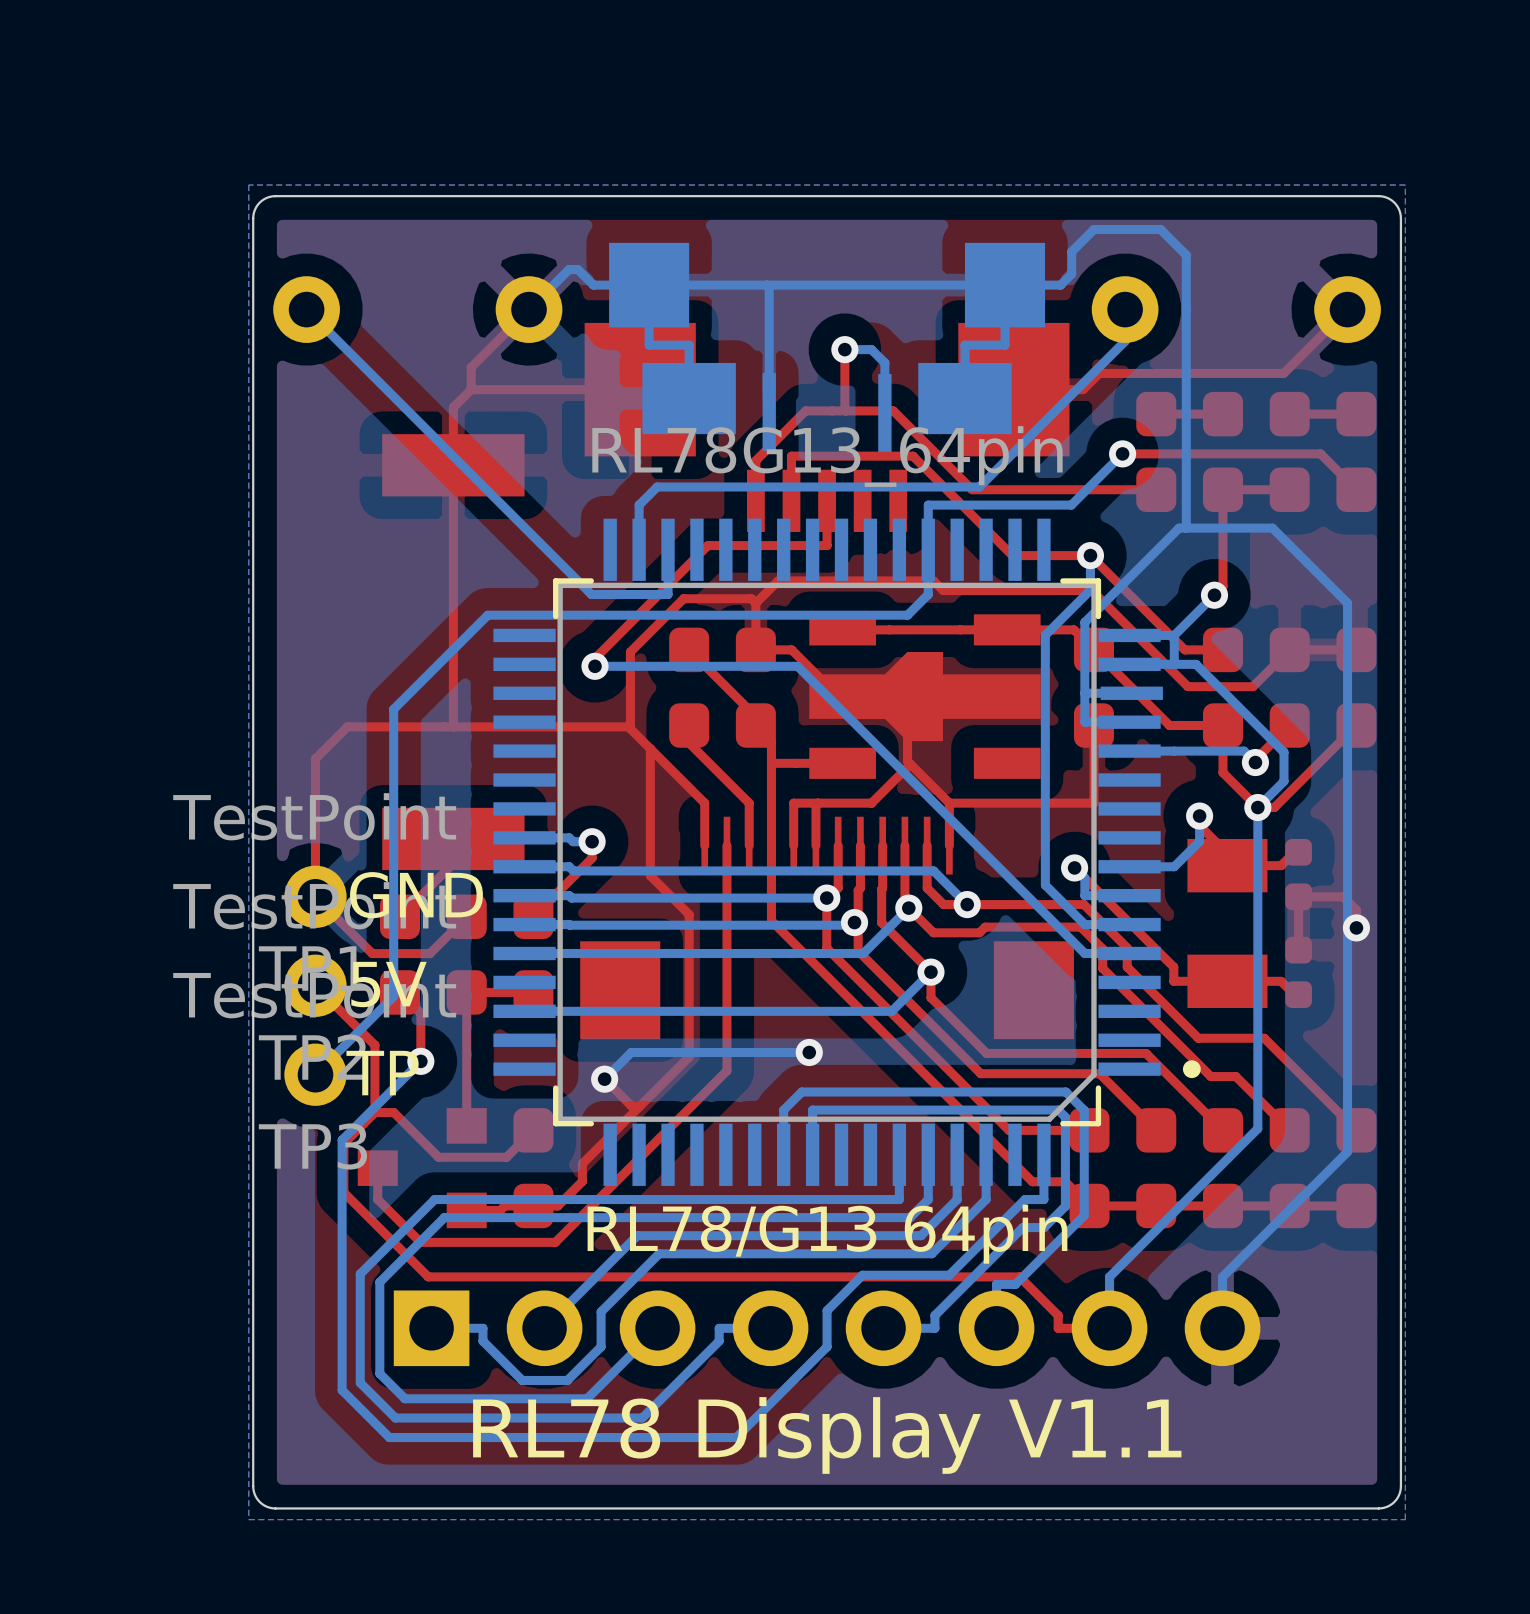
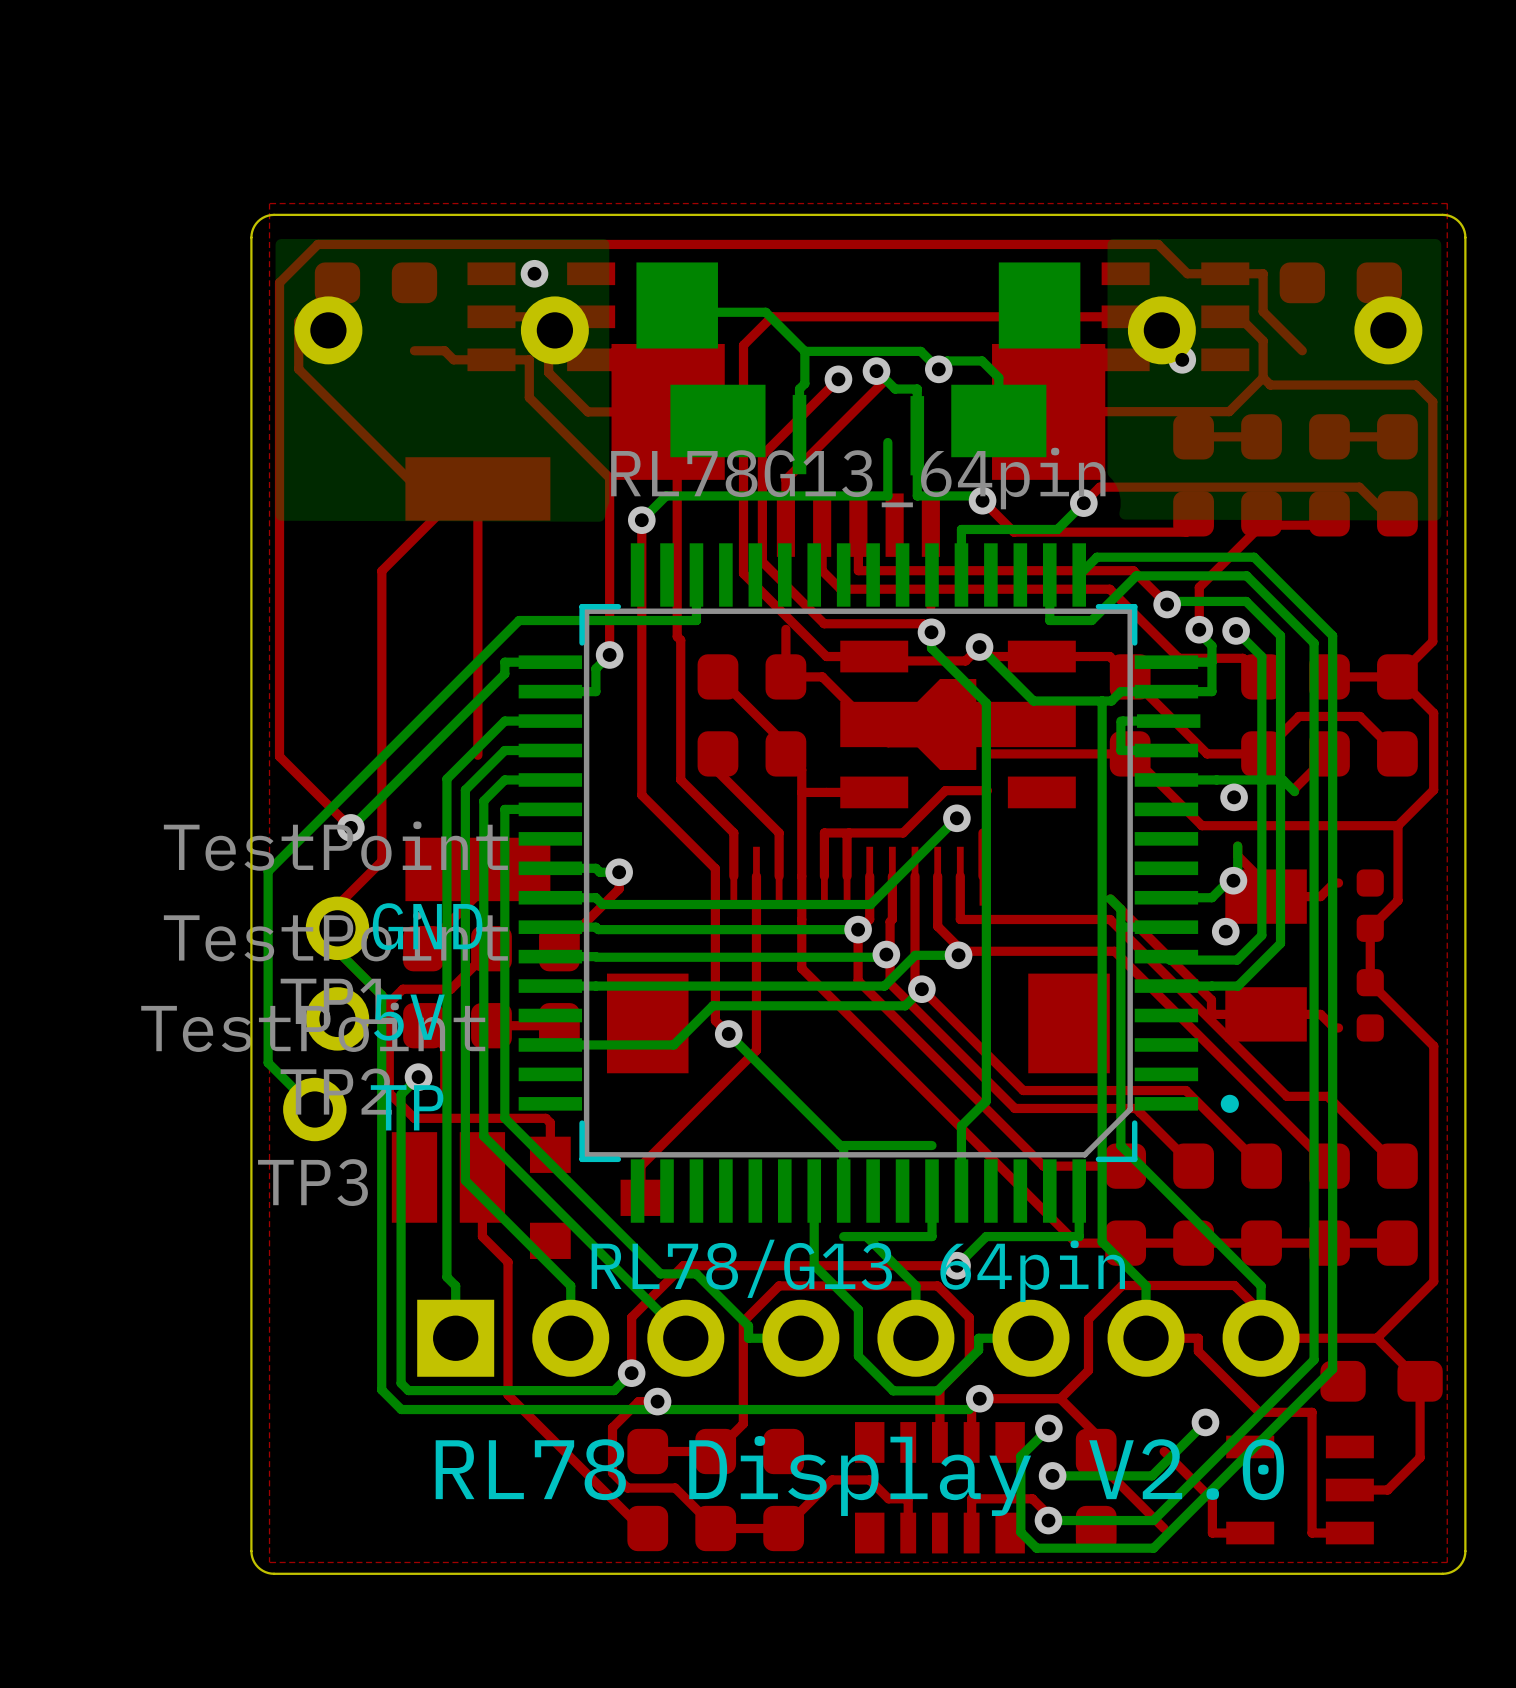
bottom zone outline: (1405, 185) (1405, 1519) (248, 1519) (248, 185) (1405, 185) -> none
board edge: (1378, 196) (1387, 197) (1394, 202) (1399, 209) (1400, 218) (1400, 1486) (1399, 1494) (1394, 1501) (1387, 1506) (1378, 1508) (275, 1508) (266, 1506) (257, 1499) (253, 1486) (253, 218) (254, 209) (259, 202) (266, 197) (275, 196) -> (1420, 214) (1445, 215) (1454, 217) (1462, 226) (1465, 237) (1465, 1551) (1463, 1559) (1458, 1567) (1451, 1572) (1442, 1573) (274, 1573) (265, 1572) (256, 1564) (251, 1551) (251, 237) (254, 226) (262, 217) (271, 215) (296, 214)
via: none -> (534, 273)
top track: none -> (337, 282) (298, 321) (298, 369) (441, 511) (381, 571) (381, 861) (314, 928) (389, 1002)
part: none -> (375, 282)
part: none -> (1340, 282)
bottom track: (649, 285) (649, 345) (689, 345) (689, 398) -> none
bottom track: (767, 285) (769, 287) (769, 367) -> (804, 351) (804, 383) (799, 389)
bottom track: (1005, 285) (1005, 345) (964, 345) (964, 356) -> (804, 351) (920, 351) (938, 369) (947, 360) (982, 360) (998, 377)
bottom track: none -> (711, 312) (765, 312) (804, 351)
part: none -> (541, 316)
part: none -> (1175, 316)
top track: none -> (1225, 316) (1239, 316) (1263, 340) (1263, 377)
bottom track: (306, 309) (591, 594) -> (314, 1109) (268, 1062) (268, 871) (519, 620) (618, 620)
top track: (529, 309) (471, 367) (471, 389) -> none
bottom track: (1125, 309) (1125, 341) (979, 486) (657, 486) (639, 505) (639, 549) -> none
top track: (1347, 309) (1283, 373) (1099, 373) (1083, 389) (1013, 389) -> none
bottom track: (532, 313) (529, 309) (569, 269) (577, 269) (593, 285) (1060, 285) (1071, 273) (1071, 251) (1093, 229) (1160, 229) (1186, 255) (1186, 528) -> none
top track: none -> (414, 350) (444, 350) (453, 359) (529, 359) (529, 397) (609, 477) (609, 654)
top track: none -> (1302, 350) (1263, 311) (1263, 273) (1187, 273) (1158, 244) (317, 244) (279, 282) (279, 756) (350, 827)
via: none -> (1182, 359)
via: none -> (938, 369)
top track: (844, 349) (845, 410) -> none
bottom track: (844, 349) (871, 349) (884, 362) (884, 367) -> (885, 379) (895, 389) (917, 389)
top track: none -> (1263, 377) (1229, 411) (1039, 411)
top track: none -> (1263, 377) (1270, 385) (1416, 385) (1432, 401) (1432, 641) (1397, 676) (1433, 713) (1433, 790) (1398, 825)
top track: none -> (838, 379) (762, 455) (762, 561) (824, 623) (922, 623) (931, 632)
via: none -> (838, 379)
top track: (471, 389) (453, 407) (453, 465) -> none
top track: (561, 389) (471, 389) -> (587, 411) (548, 372) (548, 336) (529, 316) (491, 316)
bottom track: none -> (917, 435) (917, 495) (977, 495) (982, 500)
bottom track: none -> (887, 442) (887, 495) (666, 495) (641, 520)
top track: (1122, 453) (1320, 453) (1356, 489) -> none
bottom track: (1122, 453) (1071, 505) (1022, 505) -> (1083, 503) (1057, 529)
via: (1122, 453) -> none
top track: (755, 460) (805, 410) (893, 410) (972, 489) (1156, 489) -> (785, 484) (785, 479) (885, 379)
top track: none -> (982, 500) (1013, 532) (1186, 532) (1193, 525)
via: none -> (982, 500)
top track: none -> (1083, 503) (1099, 487) (1359, 487) (1397, 525)
via: none -> (1083, 503)
top track: (1289, 489) (1222, 489) (1222, 586) (1214, 595) -> none
top track: none -> (641, 520) (641, 795) (715, 868) (715, 1020) (728, 1034)
via: none -> (641, 520)
top track: (791, 500) (791, 456) (913, 456) (1012, 555) (1090, 555) (1184, 649) (1222, 649) -> (822, 525) (822, 570) (840, 589) (1109, 589) (1178, 658) (1242, 658) (1261, 676)
top track: none -> (1329, 525) (1261, 525) (1199, 587) (1199, 629)
top track: (827, 545) (707, 545) (595, 658) (595, 666) -> (858, 570) (1133, 570) (1167, 604)
bottom track: (928, 549) (928, 594) (907, 615) (487, 615) (393, 709) (393, 996) (315, 1074) -> none
bottom track: none -> (1049, 574) (1049, 620) (1091, 620) (1136, 575) (1246, 575) (1314, 643) (1314, 1359) (1153, 1520) (1048, 1520)
bottom track: none -> (1079, 574) (1096, 557) (1254, 557) (1332, 635) (1332, 1369) (1153, 1548) (1036, 1548) (1020, 1532) (1020, 1456) (1048, 1428)
bottom track: (1090, 555) (1090, 590) (1045, 635) (1045, 885) (1084, 924) (1129, 924) -> (1236, 630) (1261, 656) (1261, 935) (1237, 960) (1169, 960) (1166, 956)
via: (1090, 555) -> none
via: none -> (1167, 604)
bottom track: (1214, 595) (1174, 635) -> (1199, 629) (1199, 633) (1211, 645) (1211, 662)
via position: (1214, 595) -> (1236, 630)
via: none -> (1199, 629)
via: none -> (931, 632)
bottom track: none -> (979, 647) (1033, 701) (1111, 701) (1120, 691) (1166, 691)
via: none -> (979, 647)
bottom track: none -> (609, 654) (595, 668) (595, 691) (550, 691)
top track: (955, 629) (842, 629) -> (989, 656) (979, 647) (965, 660) (878, 660) (874, 656) (826, 656) (743, 573) (743, 345) (771, 316) (1125, 316)
bottom track: none -> (550, 662) (504, 662) (504, 673) (350, 827)
top track: (1289, 649) (1252, 686) (1187, 686) (1091, 590) (943, 590) (933, 580) (778, 580) (755, 603) (751, 598) (683, 598) (630, 652) (630, 728) (652, 751) -> (668, 411) (677, 411) (677, 636) (680, 640) (680, 779)
bottom track: (1174, 664) (1196, 664) (1284, 752) (1284, 781) (1257, 807) (1257, 1128) (1109, 1276) -> (1102, 701) (1102, 1242) (1146, 1285) (1146, 1315)
bottom track: (595, 666) (797, 666) (1084, 953) (1129, 953) -> (1167, 604) (1170, 601) (1246, 601) (1280, 635) (1280, 943) (1237, 986) (1166, 986)
via position: (595, 666) -> (609, 654)
bottom track: none -> (550, 721) (504, 721) (446, 778) (446, 1277) (455, 1285) (455, 1338)
bottom track: (1084, 695) (1084, 622) (1179, 528) (1272, 528) (1347, 603) (1347, 1151) (1222, 1276) -> (1120, 927) (1120, 1145) (1261, 1285) (1261, 1315)
top track: (924, 697) (907, 714) (907, 761) (949, 803) (1093, 803) (1093, 725) -> none
bottom track: none -> (550, 750) (504, 750) (465, 789) (465, 1180) (570, 1285) (570, 1338)
top track: none -> (987, 753) (1130, 753) (1201, 825) (1398, 825)
top track: (1356, 725) (1274, 807) (1257, 807) (1222, 772) (1222, 725) -> (1397, 753) (1359, 716) (1298, 716) (1261, 753)
top track: (630, 726) (347, 726) (315, 758) (315, 896) (372, 953) (429, 953) -> (389, 1002) (402, 989) (450, 989) (454, 986)
top track: (650, 748) (650, 875) (689, 914) (689, 1056) (582, 1163) (582, 1181) (557, 1205) (504, 1205) (500, 1210) (466, 1210) -> none
bottom track: none -> (550, 779) (504, 779) (483, 801) (483, 1136) (685, 1338)
via: (1255, 762) -> none
top track: (910, 764) (871, 803) -> (987, 790) (945, 790) (903, 832)
via: none -> (1234, 797)
bottom track: none -> (550, 809) (504, 809) (504, 1118) (660, 1273) (696, 1273) (748, 1326) (748, 1338) (800, 1338)
via: none -> (956, 818)
top track: none -> (1398, 825) (1398, 900) (1370, 928) (1370, 982) (1433, 1046) (1433, 1281) (1377, 1338)
via: none -> (350, 827)
via: (1257, 807) -> none
via: (1199, 816) -> none
via: none -> (1233, 880)
via: (1074, 867) -> none
bottom track: (573, 870) (933, 870) (967, 904) -> (600, 902) (602, 904) (870, 904) (956, 818)
part position: (1298, 874) -> (1370, 905)
top track: (882, 888) (881, 922) (930, 972) (930, 997) (986, 1053) (1146, 1053) (1148, 1056) -> (915, 919) (915, 982) (1023, 1090) (1185, 1090)
top track: (927, 888) (943, 904) (1083, 904) (1127, 947) (1127, 967) (1198, 1038) (1264, 1038) (1287, 1061) -> (960, 919) (1110, 919) (1286, 1096) (1327, 1096)
top track: (904, 894) (904, 904) (933, 932) (979, 932) (985, 927) (1080, 927) (1102, 948) (1102, 968) (1210, 1076) (1235, 1076) -> (962, 951) (1114, 951) (1274, 1111)
top track: none -> (937, 926) (962, 951)
bottom track: none -> (314, 928) (381, 995) (381, 1389) (401, 1409) (968, 1409) (979, 1398)
via: none -> (1225, 931)
via: (967, 904) -> none
bottom track: (908, 908) (863, 953) (852, 953) -> (958, 955) (915, 955) (884, 986)
via position: (908, 908) -> (958, 955)
top track: (771, 920) (1032, 1181) (1065, 1181) (1089, 1205) -> (801, 952) (801, 968) (1076, 1243) (1125, 1243)
top track: (1356, 927) (1356, 910) (1343, 896) (1298, 896) (1298, 950) -> none
via: (1356, 927) -> none
via: none -> (921, 989)
top track: none -> (389, 1002) (389, 1093) (414, 1118) (545, 1118) (550, 1122) (550, 1154)
bottom track: (930, 972) (891, 1011) (645, 1011) -> (921, 989) (905, 1005) (712, 1005) (673, 1044)
via: (930, 972) -> none
part position: (1298, 972) -> (1370, 1005)
top track: (315, 985) (374, 1045) (374, 1112) -> none
top track: (466, 992) (466, 1125) -> none
bottom track: none -> (728, 1034) (840, 1145) (843, 1145)
via: none -> (728, 1034)
top track: (726, 1016) (726, 1070) (555, 1242) (420, 1242) (377, 1199) (377, 1168) -> (756, 1050) (640, 1165) (640, 1197)
bottom track: none -> (418, 1077) (401, 1094) (401, 1383) (408, 1390) (614, 1390) (631, 1373)
bottom track: (809, 1052) (631, 1052) (604, 1079) -> none
via: (809, 1052) -> none
bottom track: (420, 1061) (342, 1140) (342, 1390) (389, 1437) (736, 1437) (827, 1346) (827, 1316) -> (1030, 1338) (978, 1338) (978, 1350) (937, 1390) (893, 1390) (858, 1356)
via position: (420, 1061) -> (418, 1077)
TP3 position: (315, 1074) -> (314, 1109)
top track: (604, 1079) (631, 1105) (640, 1105) -> none
via: (604, 1079) -> none
part footprint: [357, 1108, 487, 1229] -> [391, 1132, 506, 1223]
part footprint: [513, 1108, 554, 1229] -> [529, 1136, 662, 1259]
bottom track: (899, 1110) (1058, 1110) (1065, 1117) (1065, 1206) (1044, 1227) (1022, 1227) (934, 1315) (934, 1328) (883, 1328) -> none
top track: (374, 1112) (393, 1112) (438, 1157) (506, 1157) (533, 1130) -> none
top track: (374, 1112) (343, 1143) (343, 1192) (428, 1276) (1019, 1276) (1058, 1315) (1058, 1328) (1109, 1328) -> none
top track: none -> (482, 1177) (482, 1236) (508, 1262) (508, 1394) (641, 1528) (647, 1528)
bottom track: (783, 1154) (783, 1110) (801, 1092) (1065, 1092) (1084, 1110) (1084, 1215) (1015, 1284) (996, 1284) (996, 1328) -> (814, 1191) (814, 1265) (858, 1309) (858, 1349)
bottom track: (928, 1154) (928, 1199) (910, 1217) (444, 1217) (379, 1282) (379, 1373) (404, 1398) (587, 1398) (657, 1328) -> (961, 1191) (961, 1125) (986, 1101) (986, 703) (931, 648) (931, 632)
bottom track: (957, 1154) (957, 1199) (921, 1235) (637, 1235) (544, 1328) -> none
bottom track: (986, 1154) (986, 1199) (931, 1253) (659, 1253) (601, 1311) (601, 1346) (567, 1380) (522, 1380) (482, 1341) (482, 1328) (431, 1328) -> none
bottom track: (812, 1199) (434, 1199) (360, 1273) (360, 1382) (395, 1418) (642, 1418) (719, 1341) (719, 1328) (770, 1328) -> none
bottom track: none -> (866, 1236) (915, 1285) (915, 1338)
bottom track: (1025, 1199) (949, 1275) (862, 1275) (827, 1310) -> (1059, 1236) (986, 1236) (957, 1265)
top track: none -> (957, 1265) (683, 1265) (631, 1317) (631, 1373)
via: none -> (957, 1265)
top track: none -> (1146, 1338) (1198, 1338) (1198, 1351) (1259, 1412) (1312, 1412) (1312, 1533) (1349, 1533)
top track: none -> (1287, 1338) (1234, 1285) (1122, 1285) (1088, 1319) (1088, 1370) (1060, 1398)
top track: none -> (1377, 1338) (1261, 1338)
top track: none -> (1377, 1338) (1420, 1381) (1420, 1457) (1387, 1490) (1349, 1490)
part position: (827, 1328) -> (858, 1338)
via: none -> (631, 1373)
part: none -> (1381, 1381)
via: none -> (979, 1398)
top track: none -> (1060, 1398) (979, 1398) (971, 1408) (971, 1442)
top track: none -> (1060, 1398) (1096, 1434) (1096, 1460) (1164, 1528)
top track: none -> (657, 1401) (638, 1401) (612, 1427) (612, 1472) (627, 1488) (675, 1488) (715, 1528) (783, 1528) (832, 1479) (869, 1479) (888, 1498) (908, 1498) (908, 1533)
via: none -> (657, 1401)
bottom track: none -> (1205, 1422) (1152, 1475) (1052, 1475)
via: none -> (1205, 1422)
via: none -> (1048, 1428)
top track: none -> (939, 1442) (939, 1388) (969, 1359) (969, 1317) (937, 1285) (779, 1285) (743, 1321) (743, 1423) (715, 1451) (647, 1451)
top track: none -> (1164, 1451) (1212, 1499) (1212, 1533) (1250, 1533)
via: none -> (1052, 1475)
text: RL78 Display V1.1 (827, 1435) -> RL78 Display V2.0 (859, 1476)
part: none -> (939, 1487)
part: none -> (647, 1490)
part: none -> (715, 1490)
part: none -> (783, 1490)
part: none -> (1096, 1490)
part: none -> (1300, 1490)
top track: none -> (1048, 1520) (1048, 1514) (1032, 1498) (971, 1498) (971, 1533)
via: none -> (1048, 1520)

